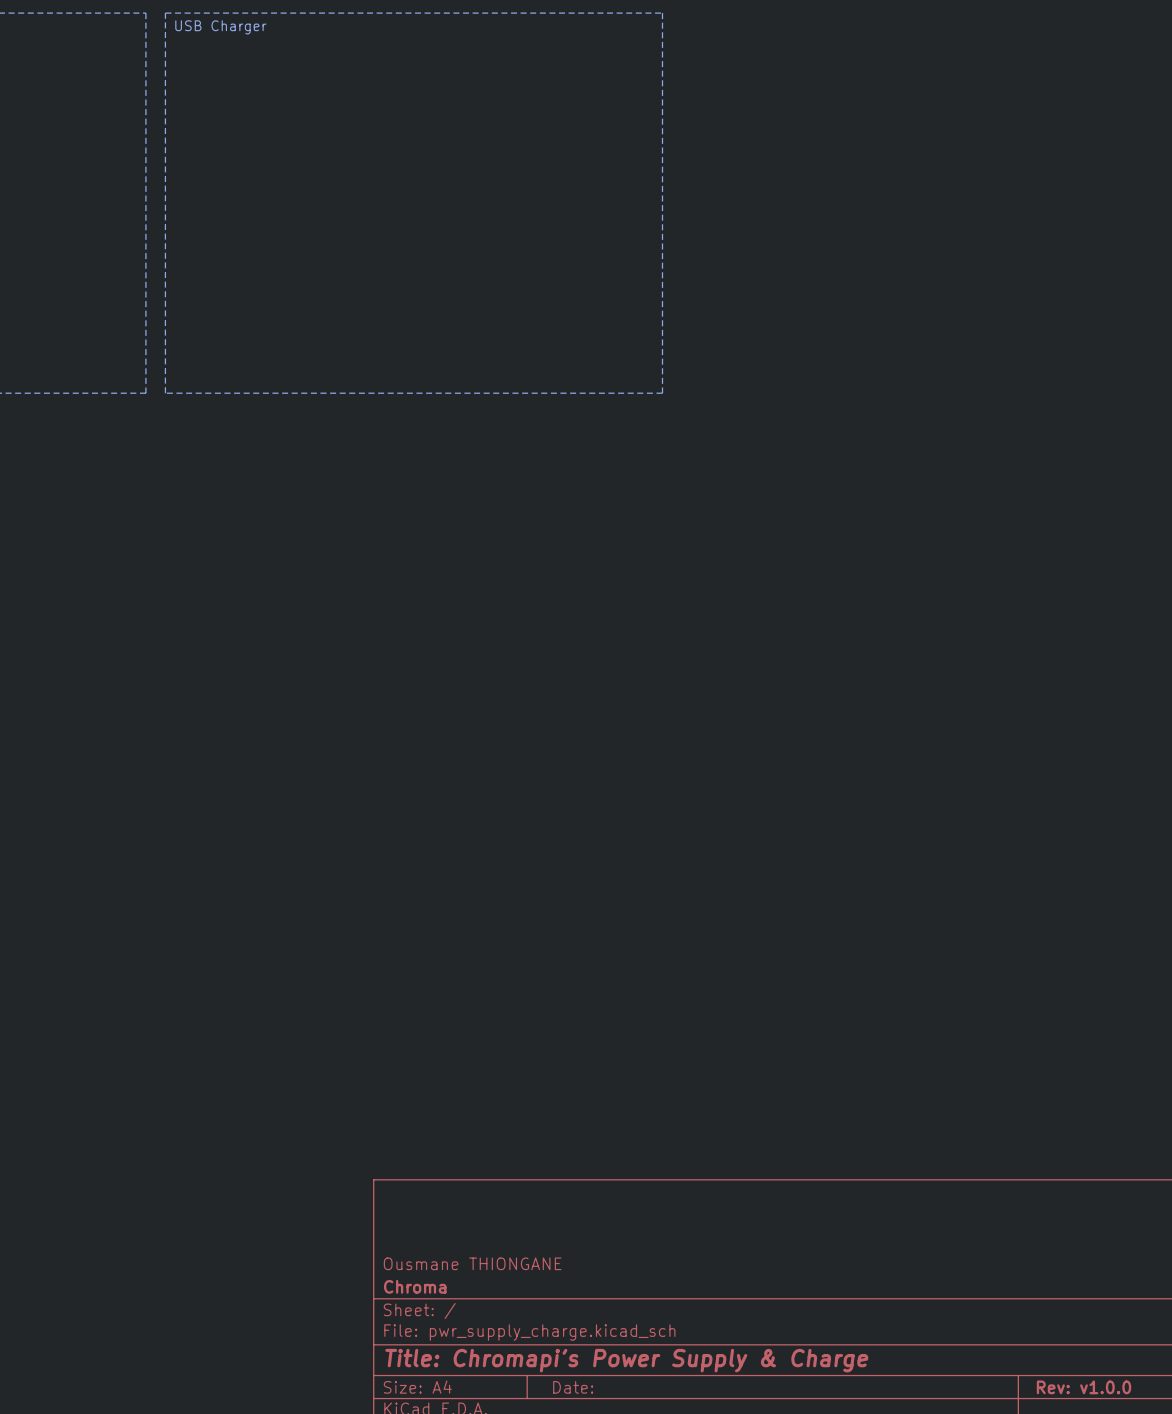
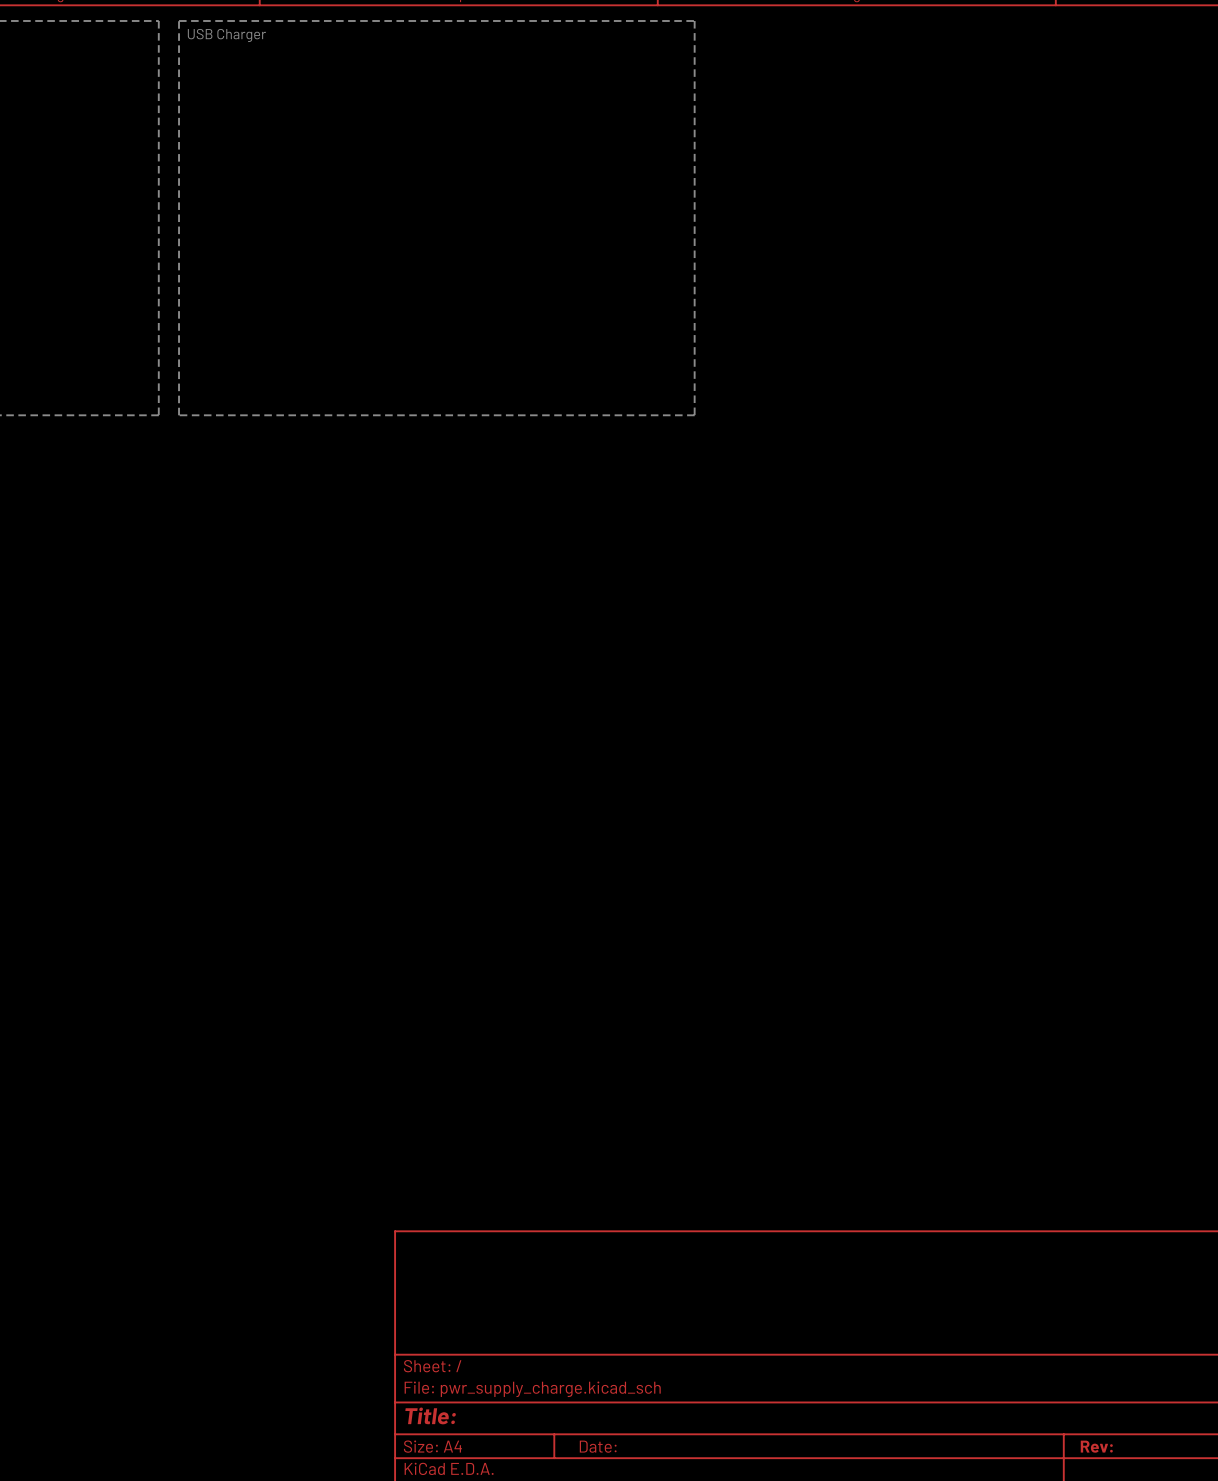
title block: Ousmane THIONGANE (472, 1263) -> none
title block: Chroma (415, 1286) -> none
title block: Title: Chromapi's Power Supply & Charge (626, 1360) -> Title: (430, 1415)
title block: Rev: v1.0.0 (1084, 1387) -> Rev: (1096, 1446)

